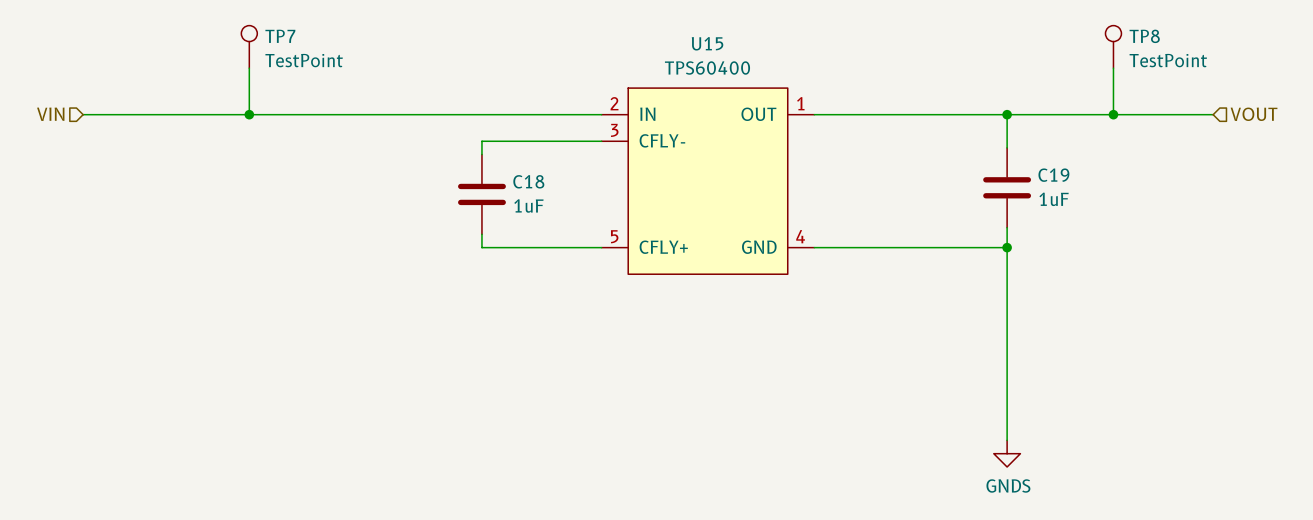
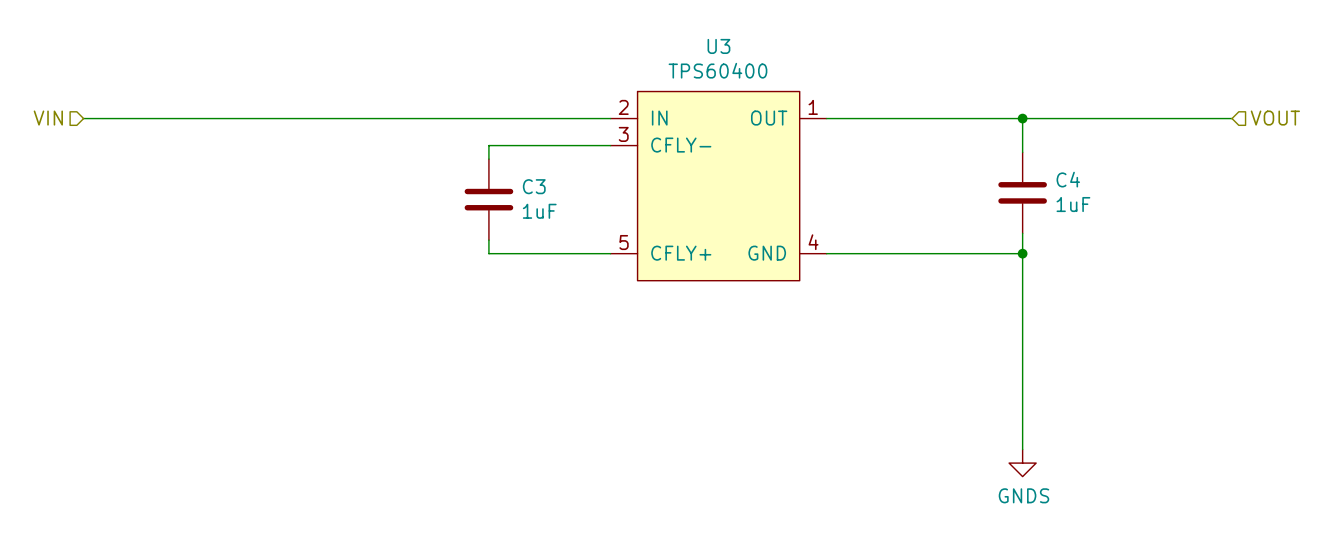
U15 name: U15 (707, 43) -> U3 (718, 46)
TP7: TestPoint (249, 46) -> none
TP8: TestPoint (1113, 46) -> none
wire: (249, 68) (249, 114) -> none
wire: (1113, 68) (1113, 114) -> none
junction: (249, 114) -> none
junction: (1113, 114) -> none
C19 name: C19 (1053, 175) -> C4 (1068, 179)
C18 name: C18 (528, 181) -> C3 (534, 186)

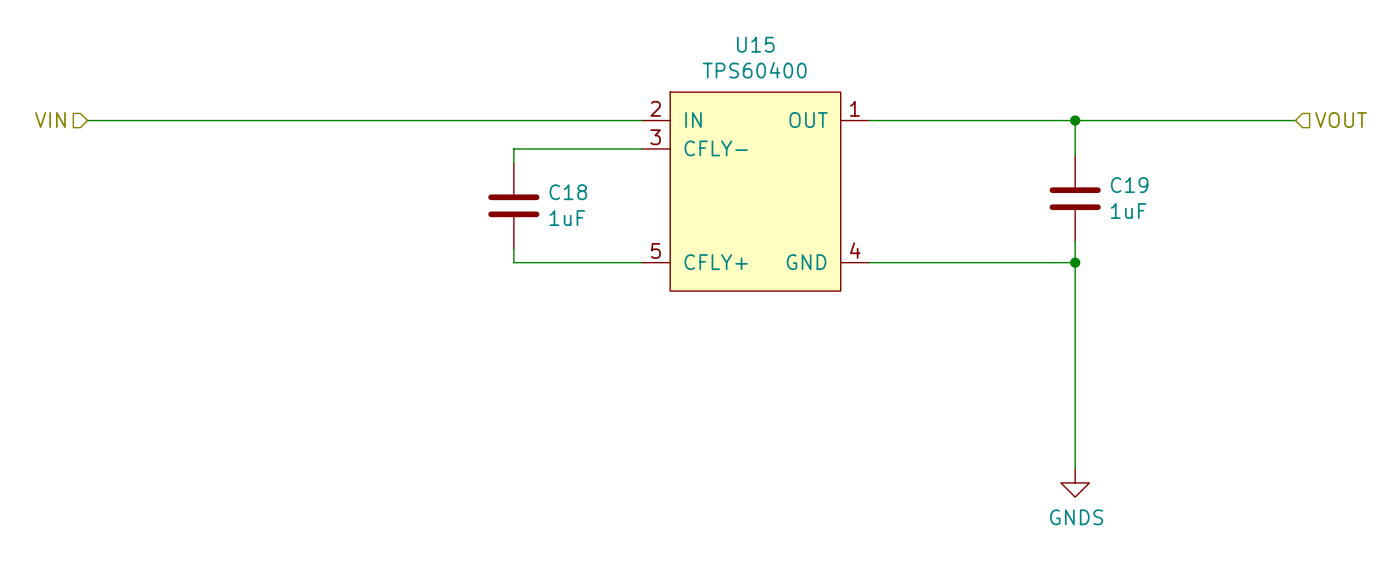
U3 name: U3 (718, 46) -> U15 (755, 44)
C4 name: C4 (1068, 179) -> C19 (1129, 185)
C3 name: C3 (534, 186) -> C18 (568, 192)

